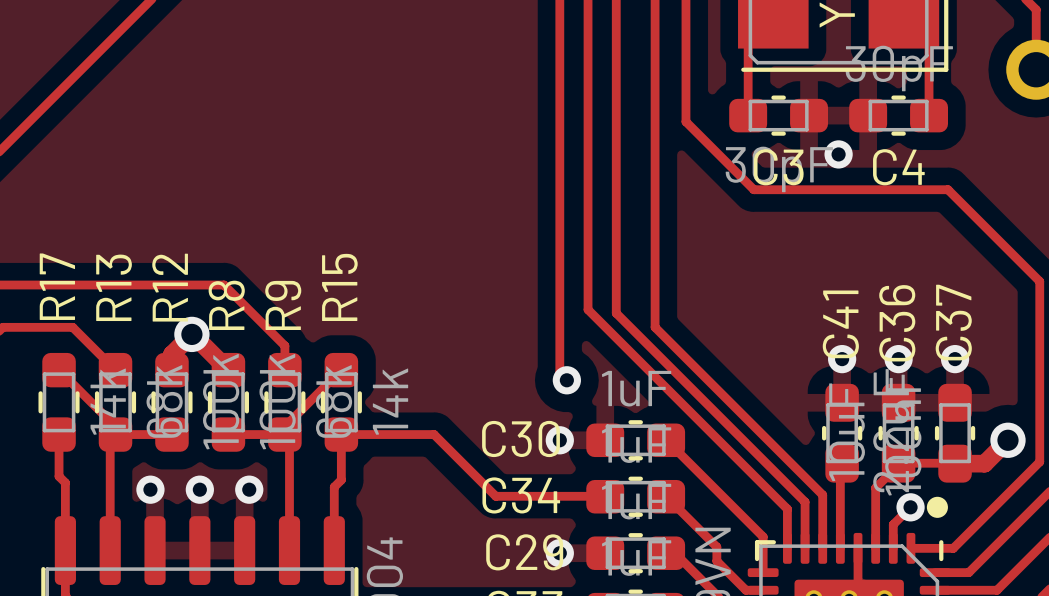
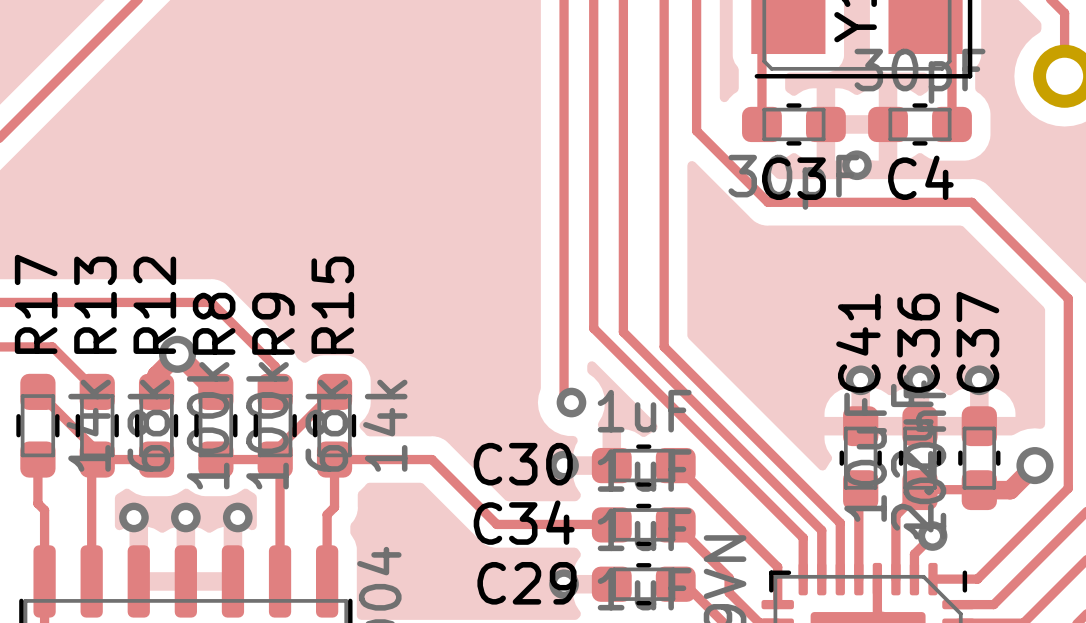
drawing: [926, 496, 948, 518] -> none

